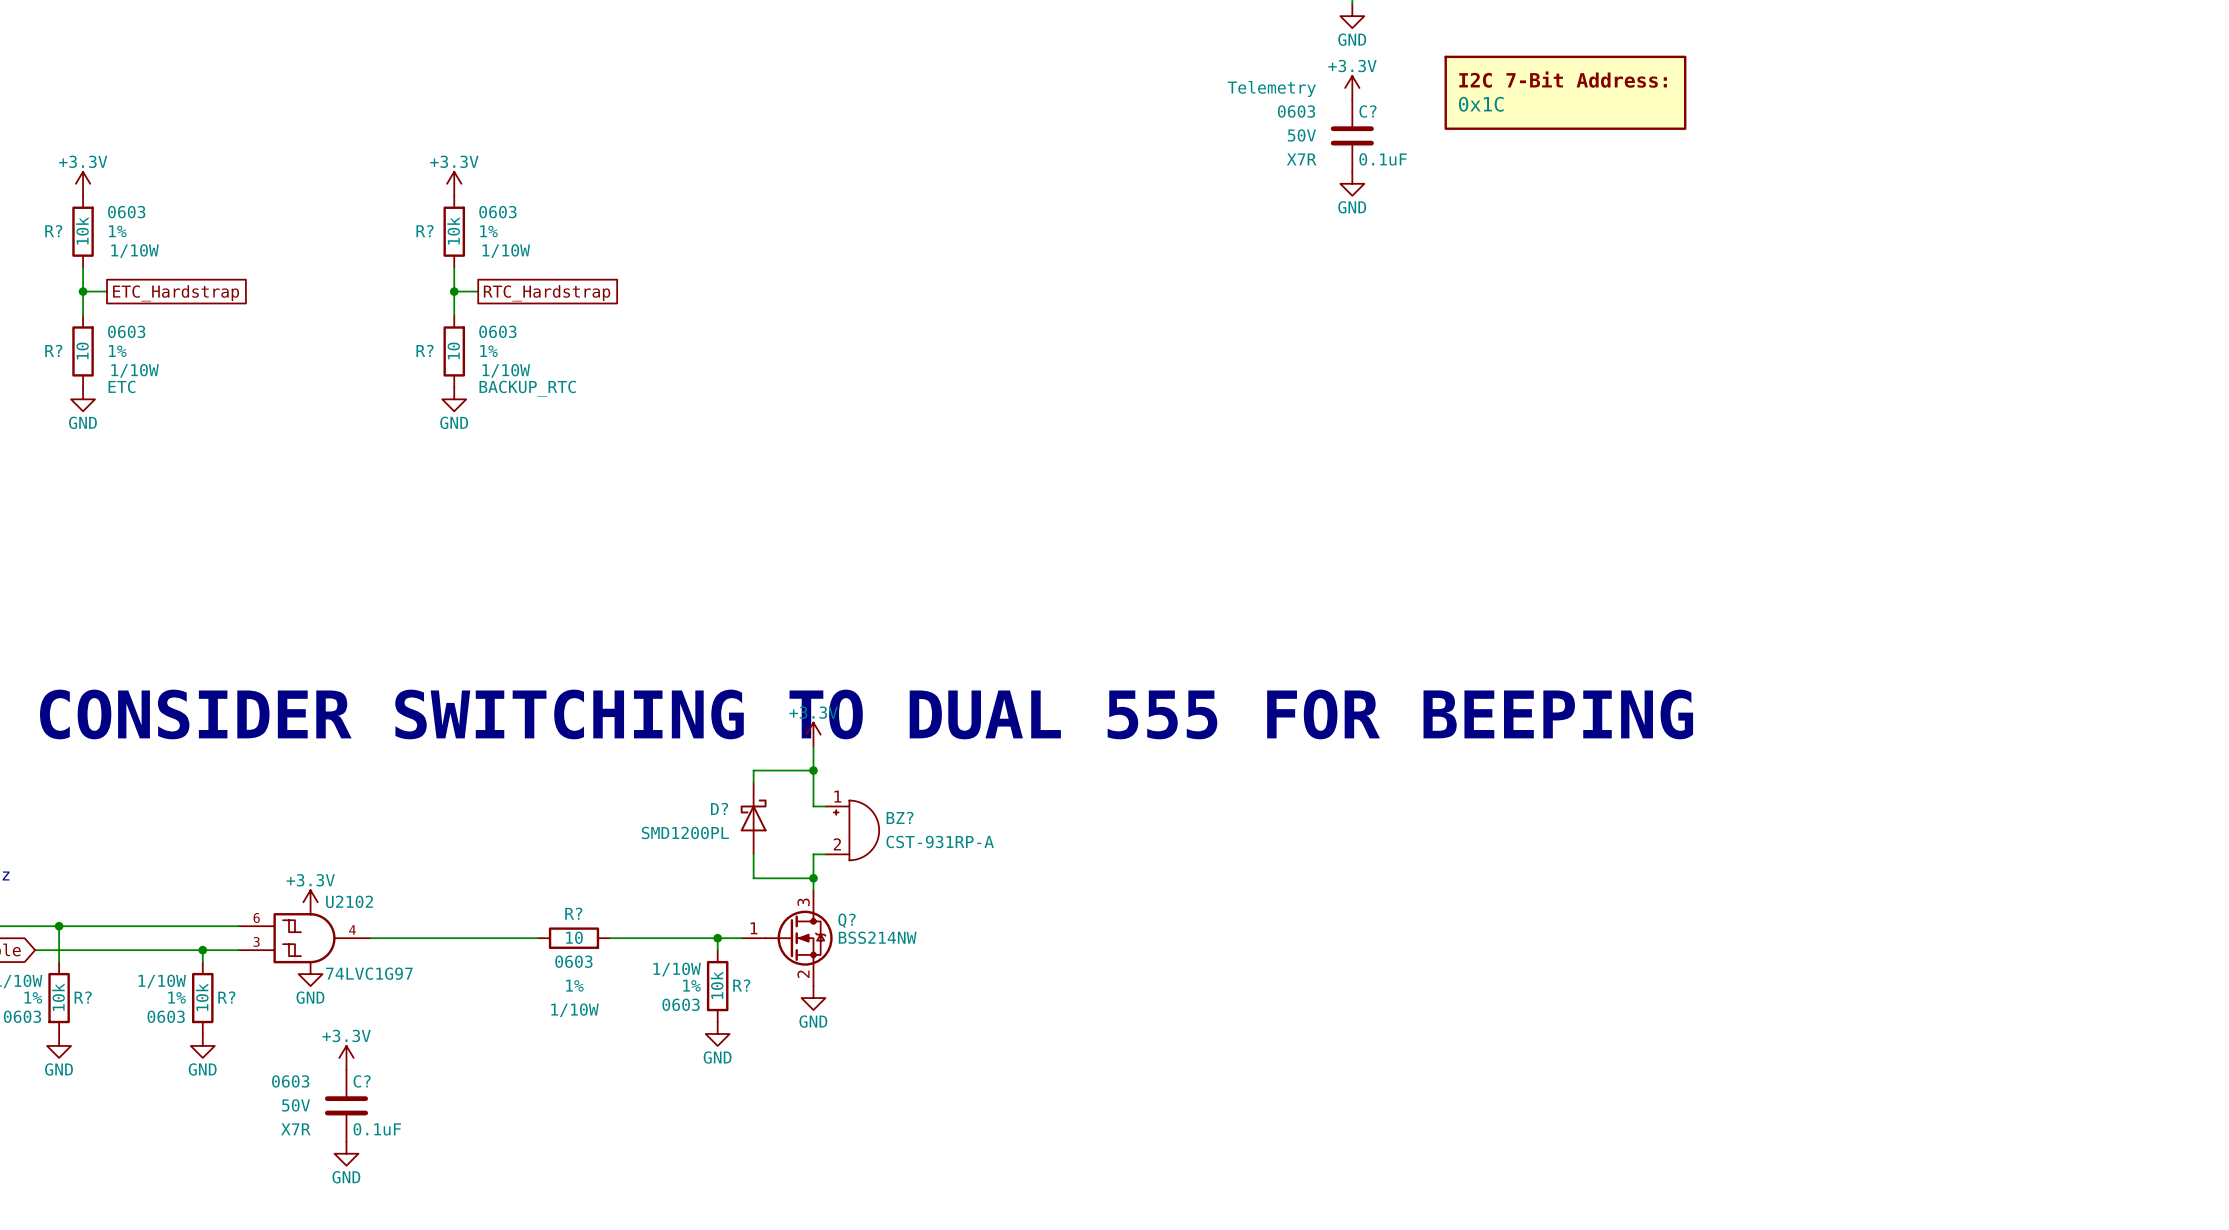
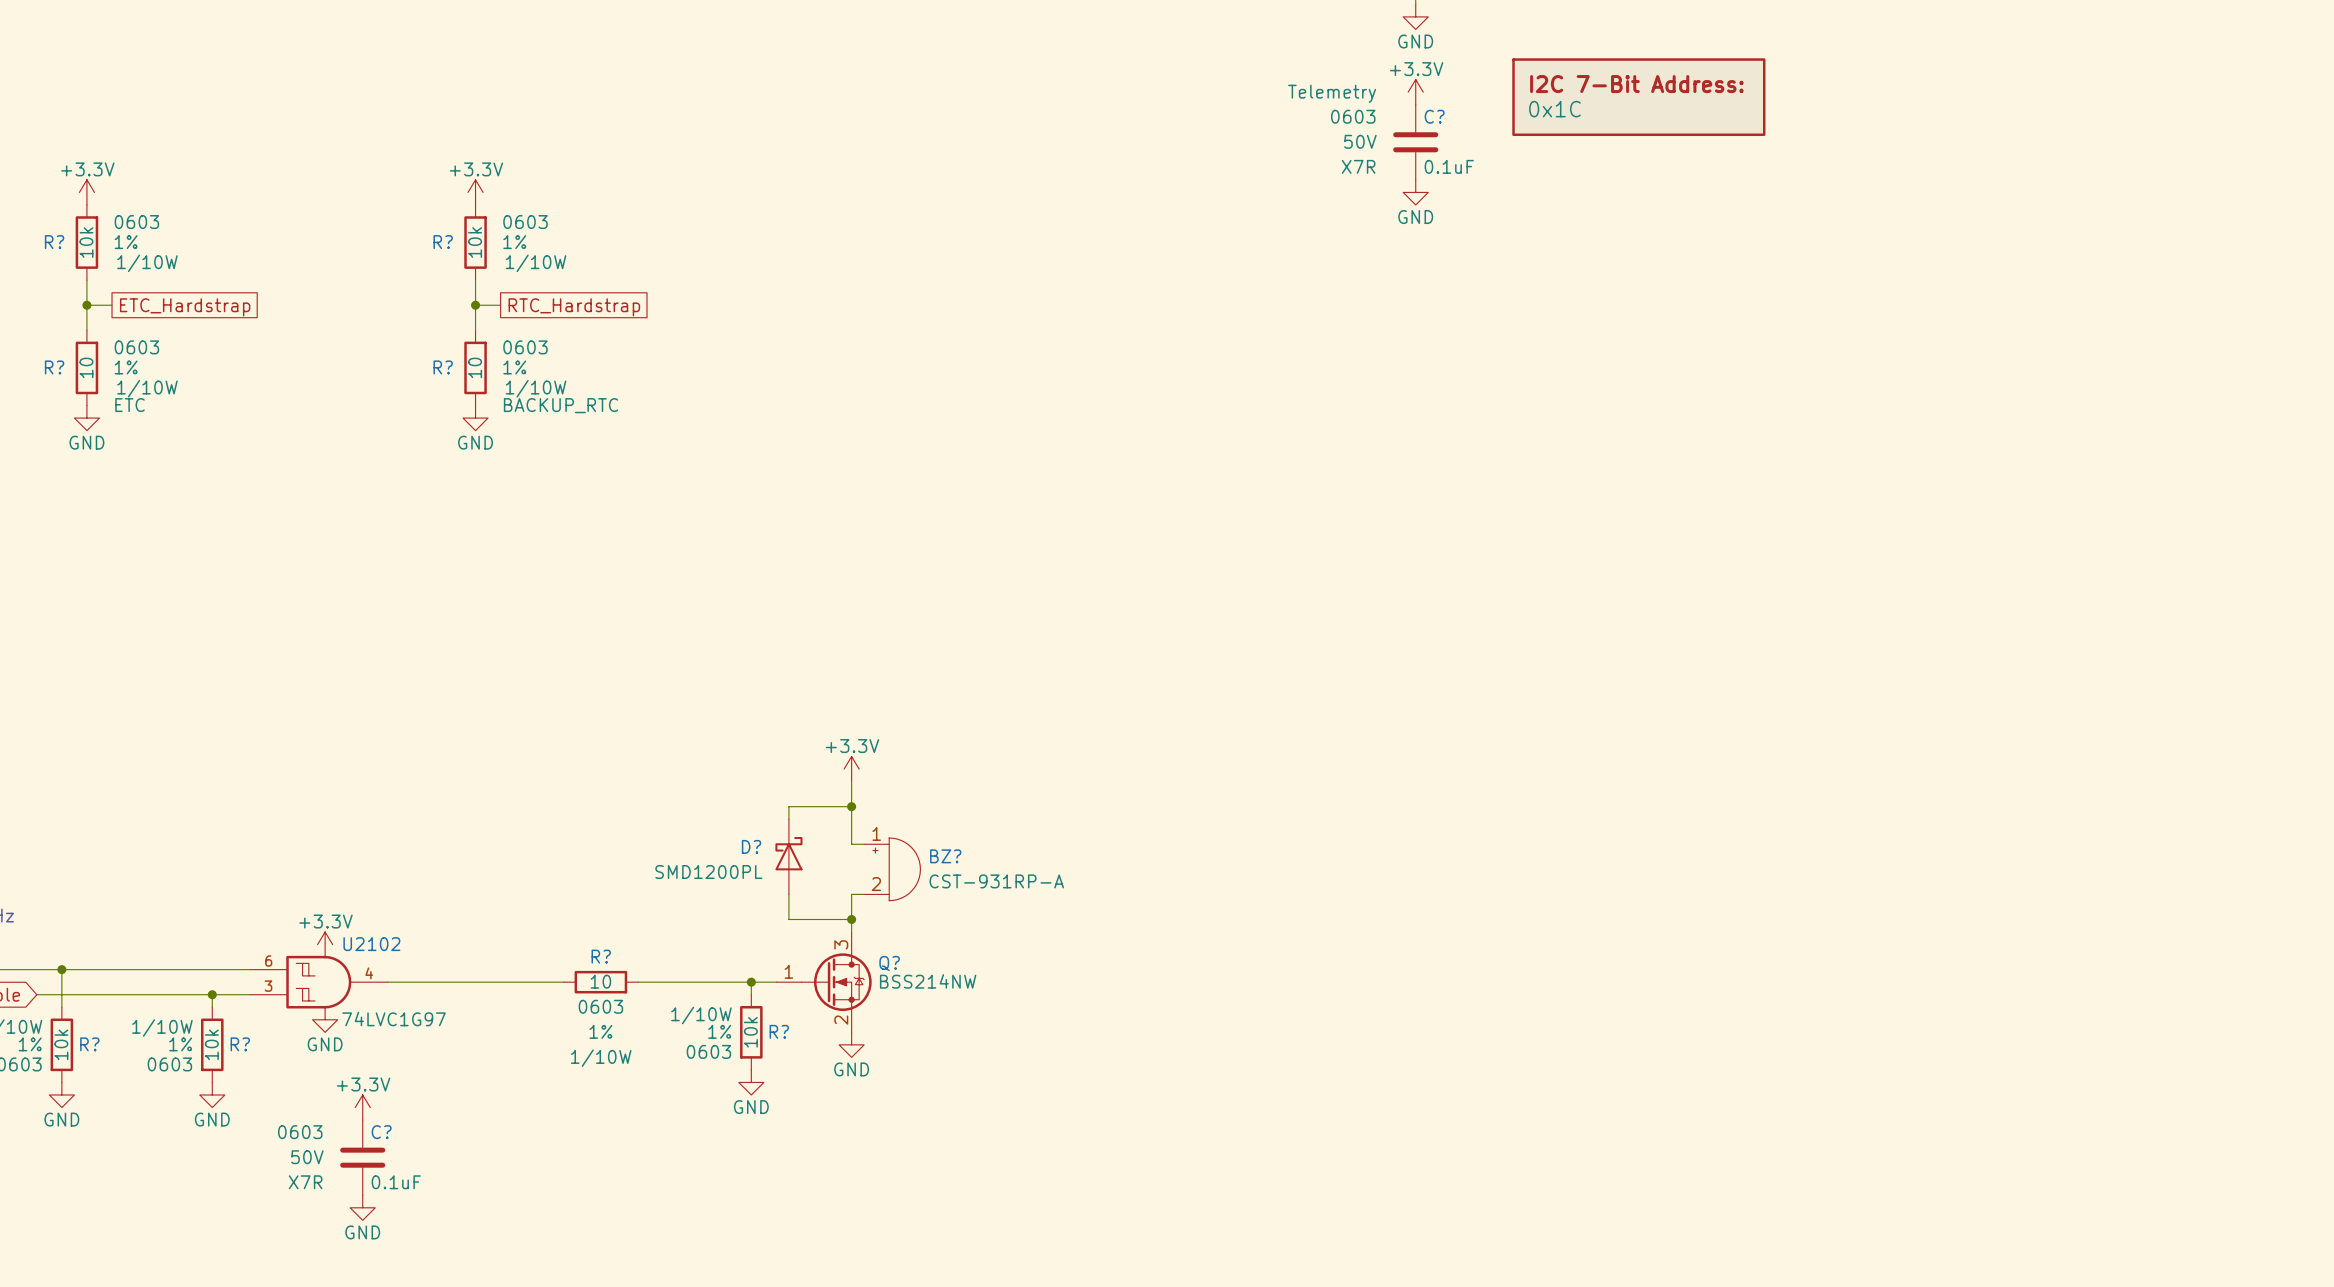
text: CONSIDER SWITCHING TO DUAL 555 FOR BEEPING (866, 714) -> none

